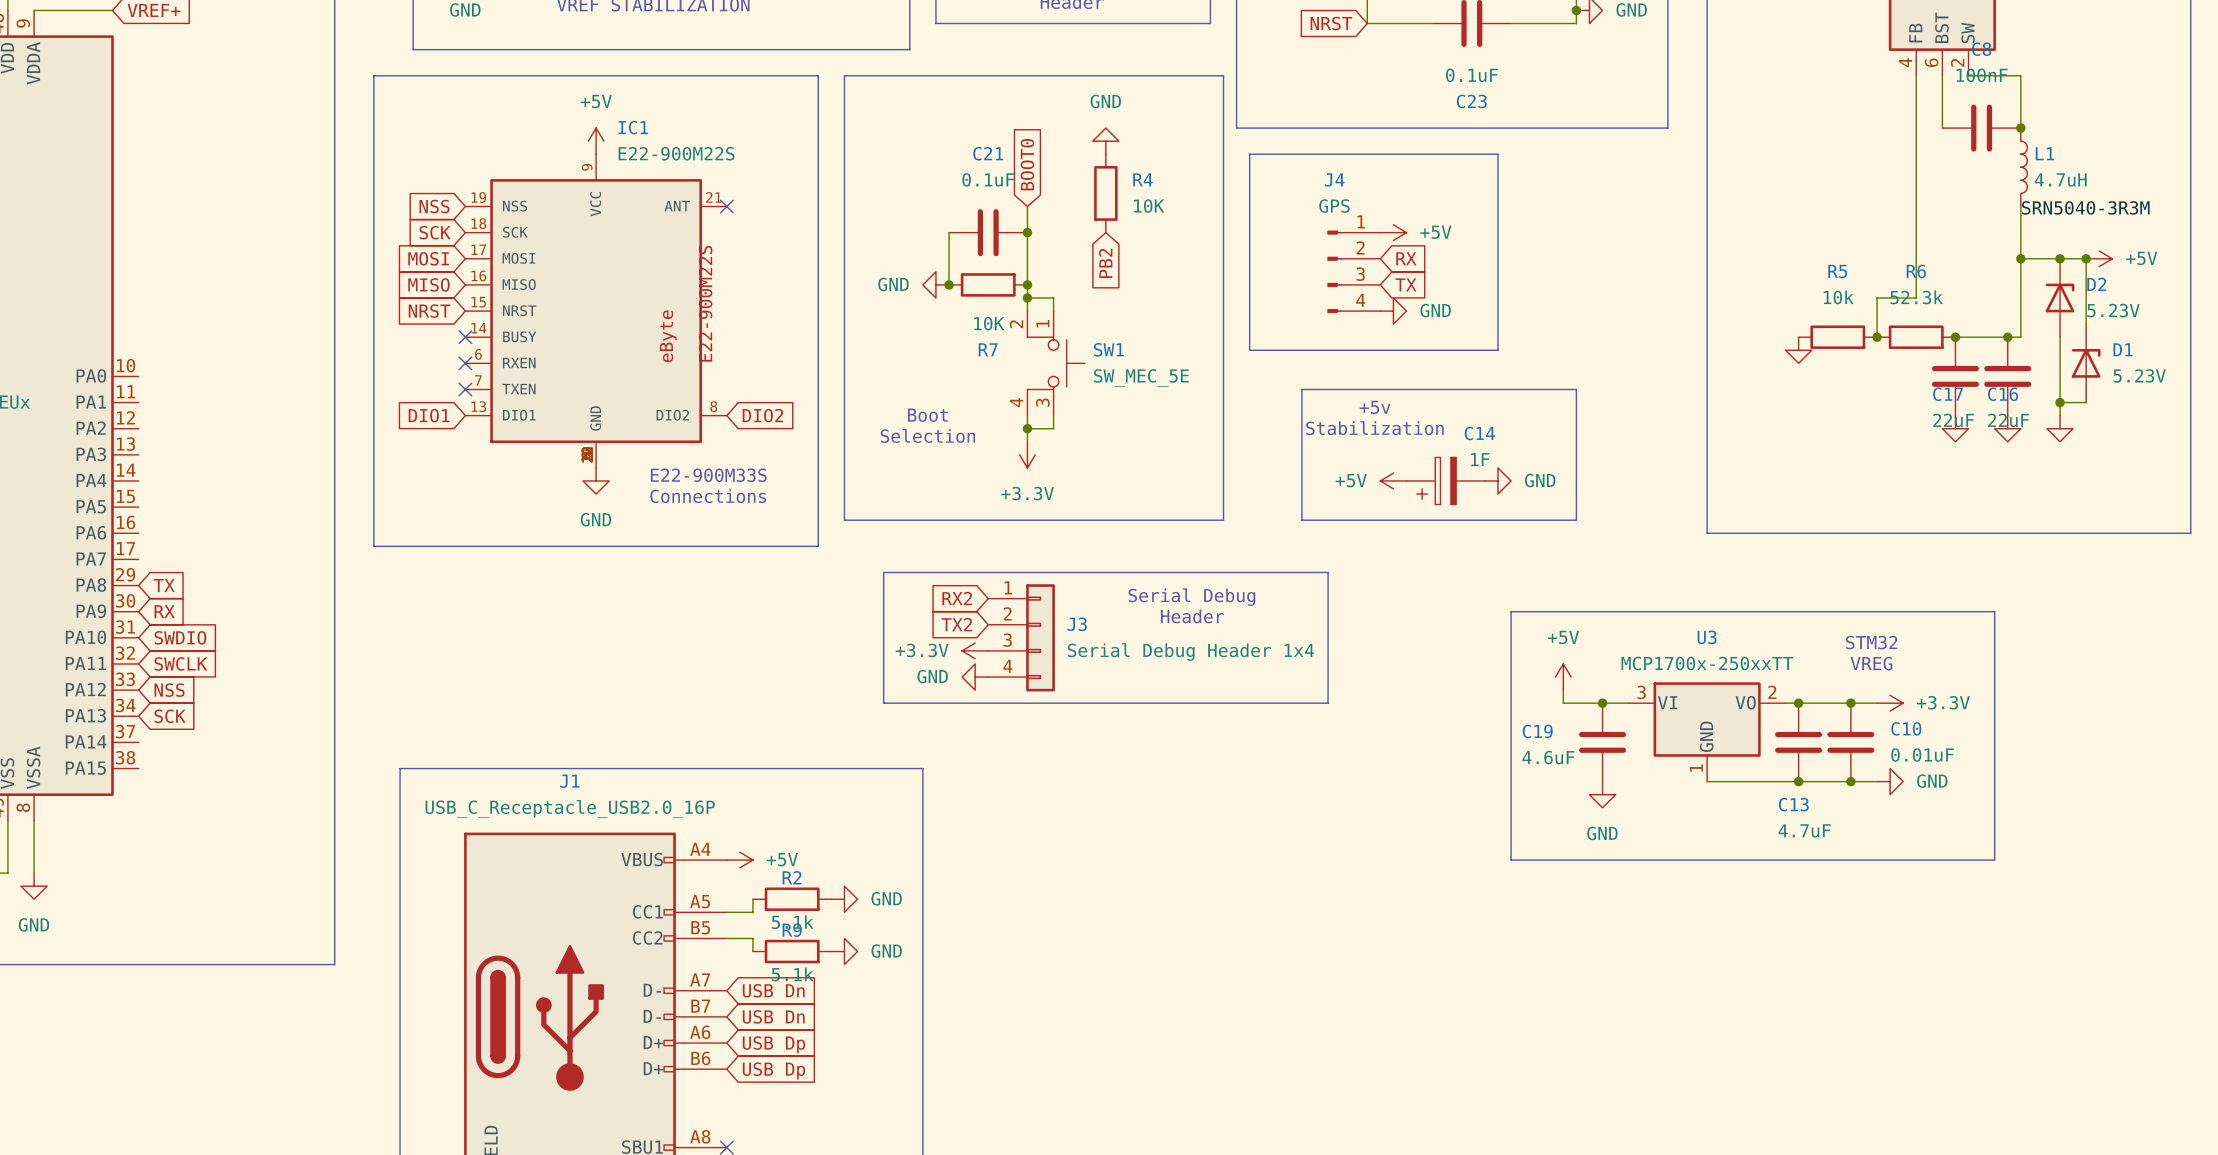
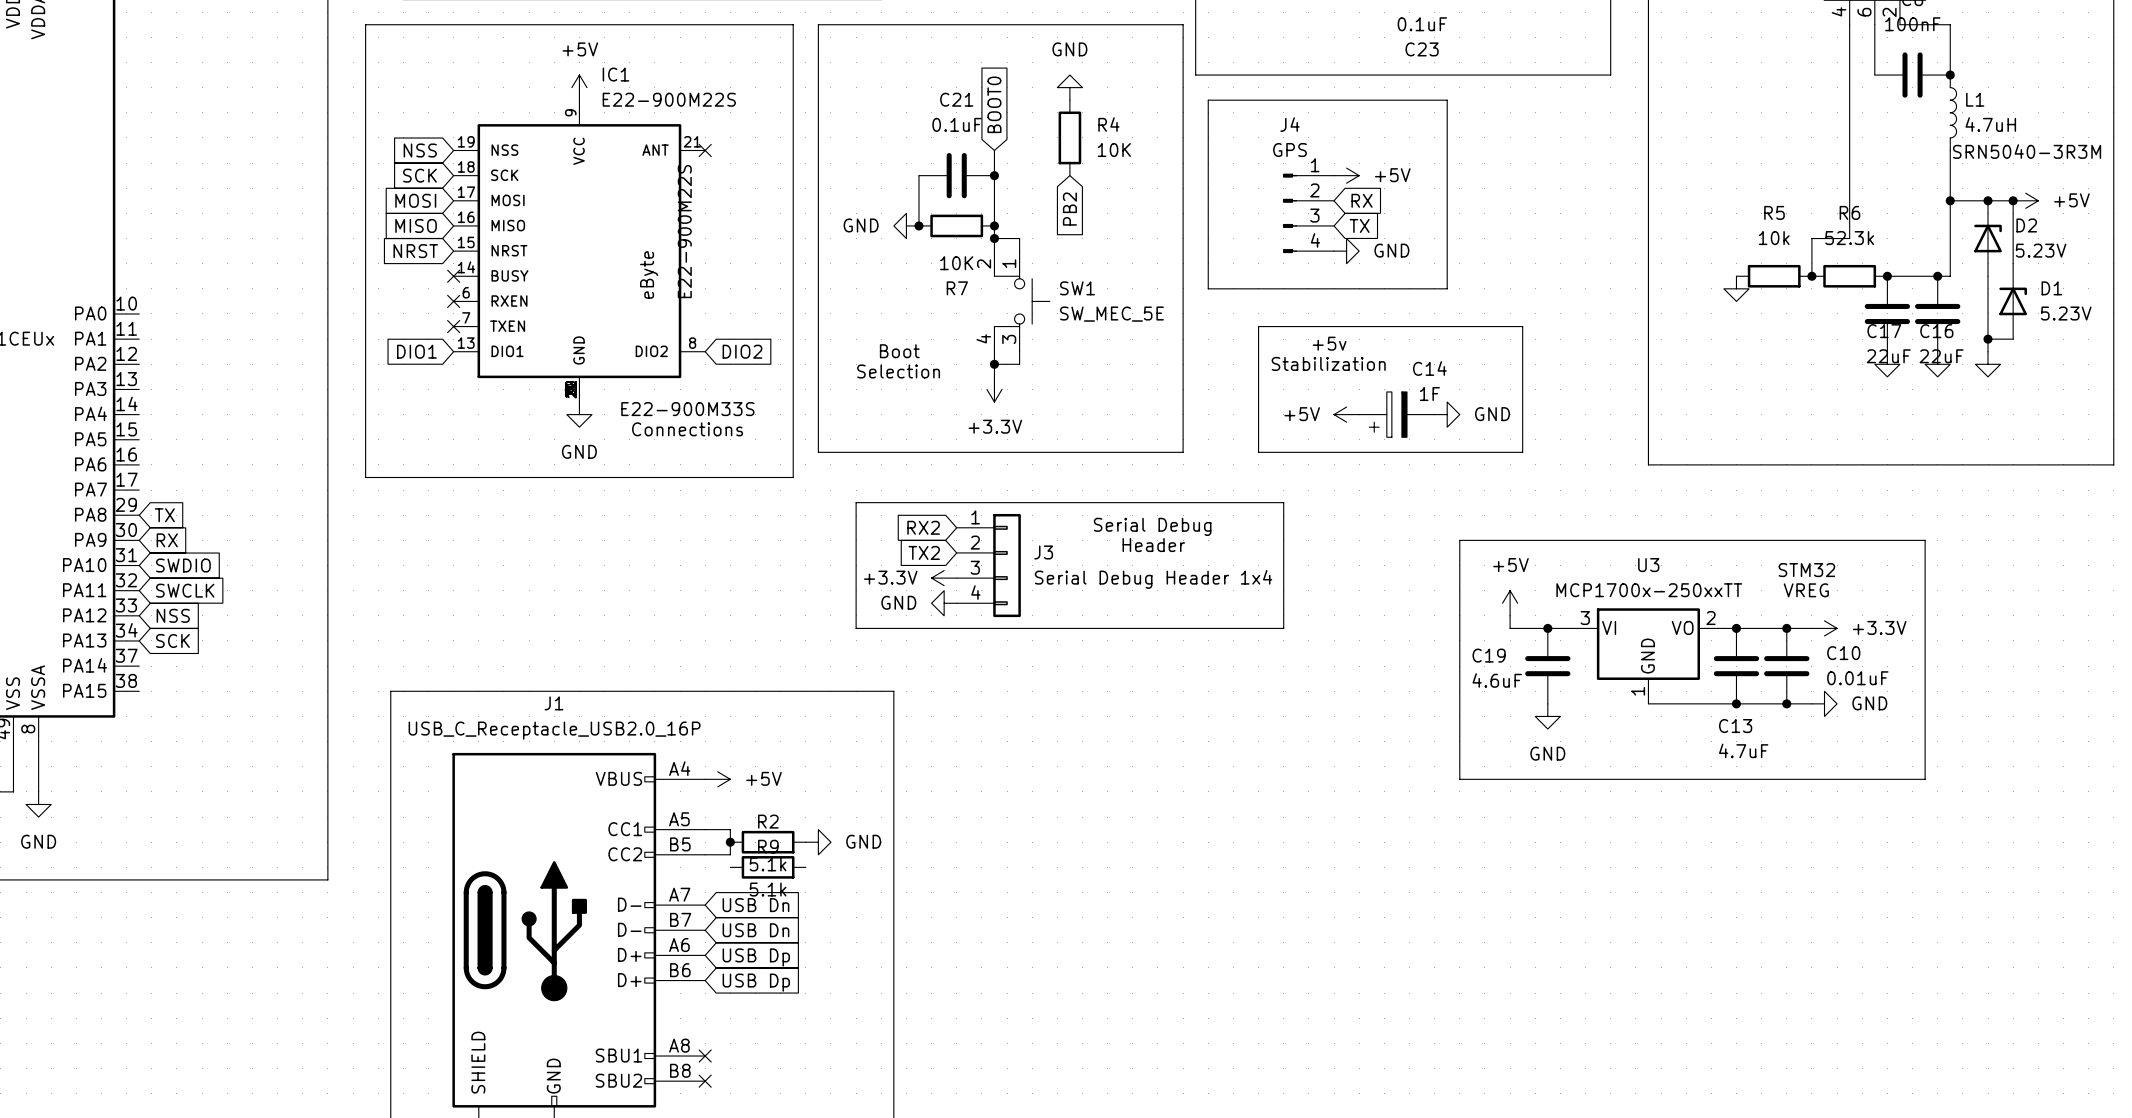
wire: (752, 899) (752, 912) -> (730, 854) (730, 829)
R2 position: (792, 899) -> (768, 842)
power symbol: GND (844, 899) -> none
junction: none -> (730, 842)
power symbol: none -> GND (818, 842)
wire: (752, 938) (752, 951) -> none
power symbol: GND (844, 951) -> none

